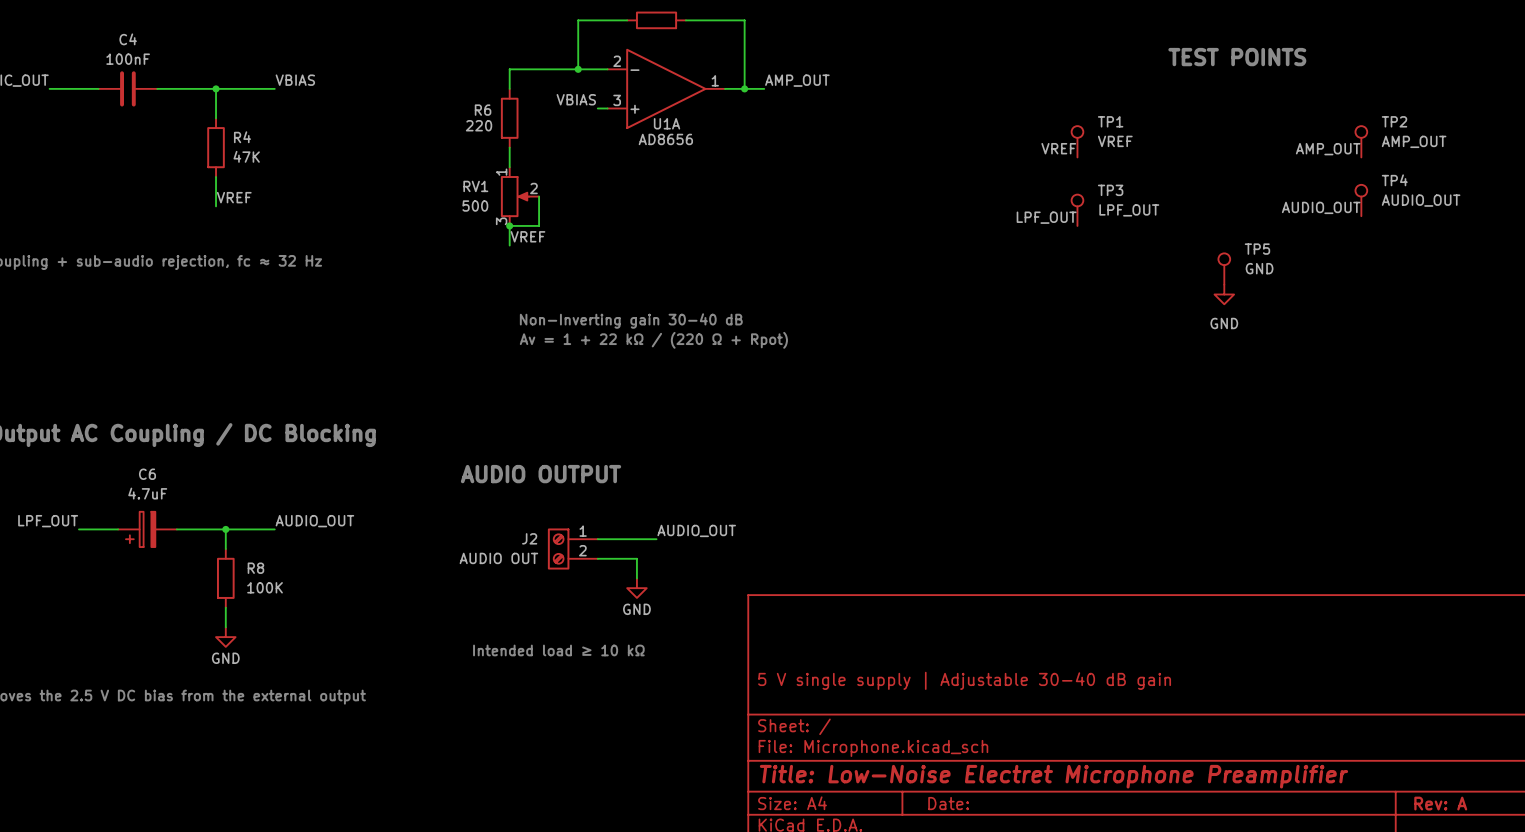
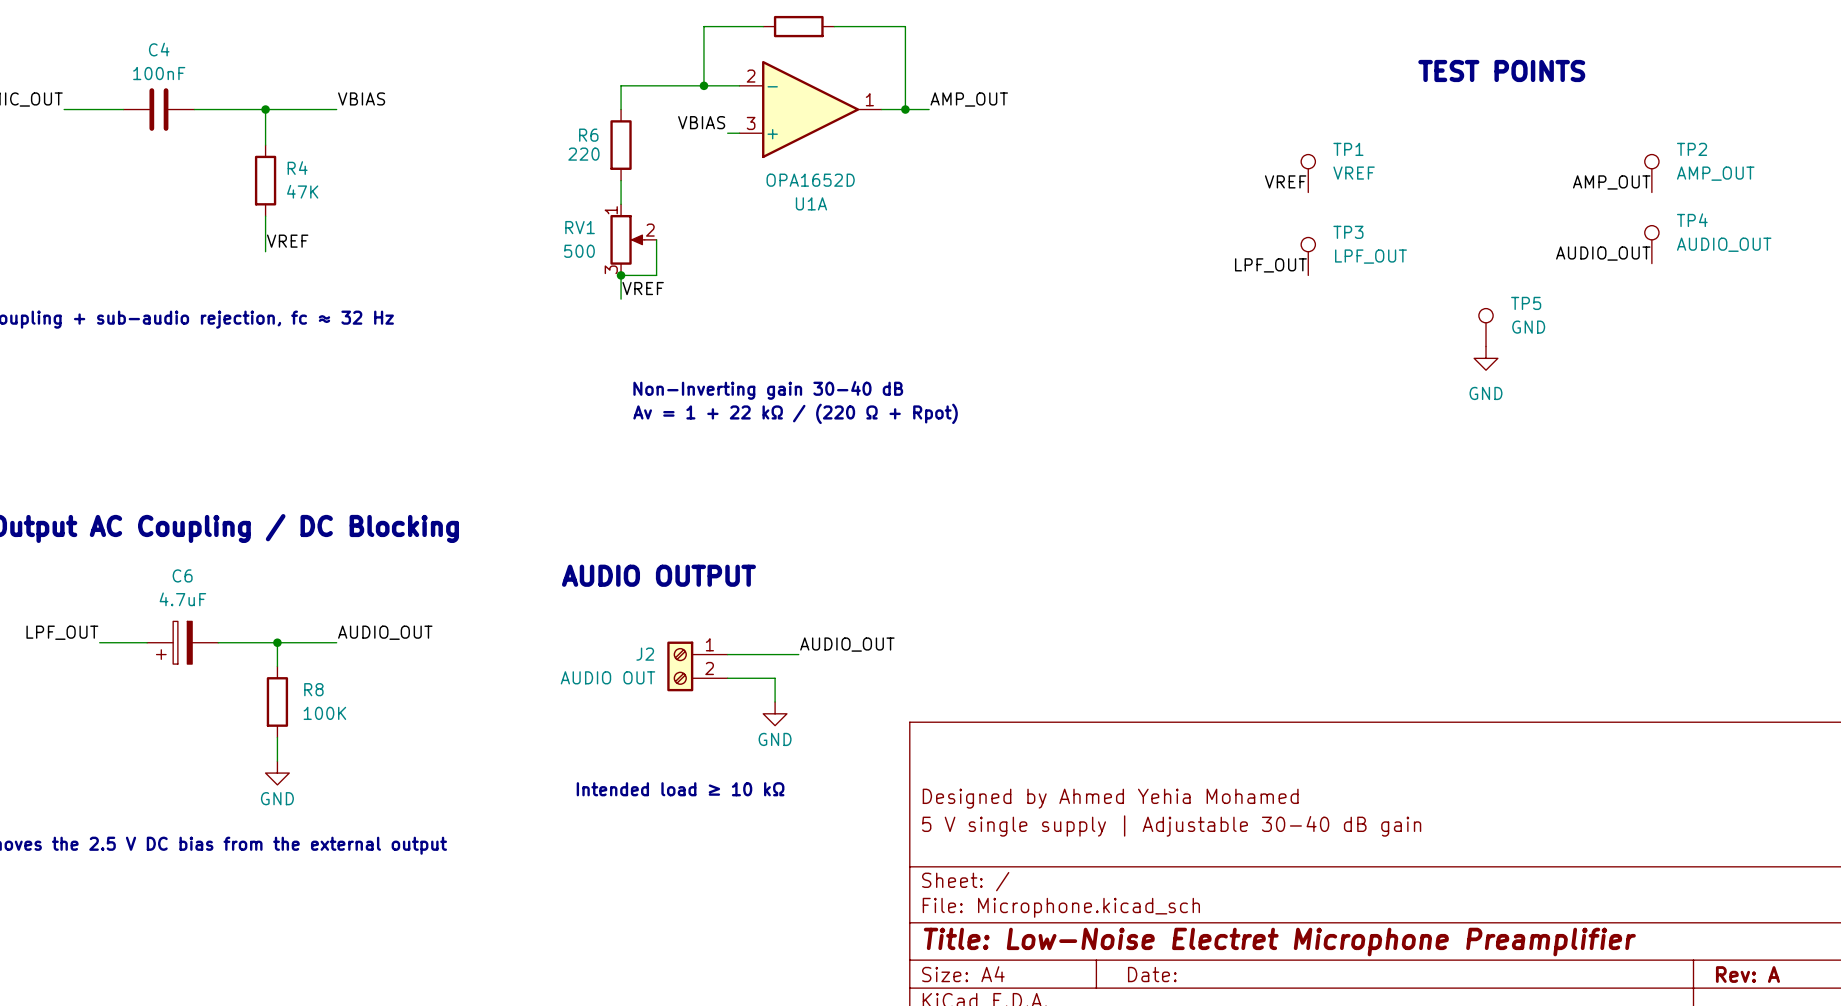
U1A name position: U1A (667, 123) -> U1A (811, 203)
U1A value: AD8656 (665, 139) -> OPA1652D (810, 180)
title block: none -> Designed by Ahmed Yehia Mohamed (1110, 798)

